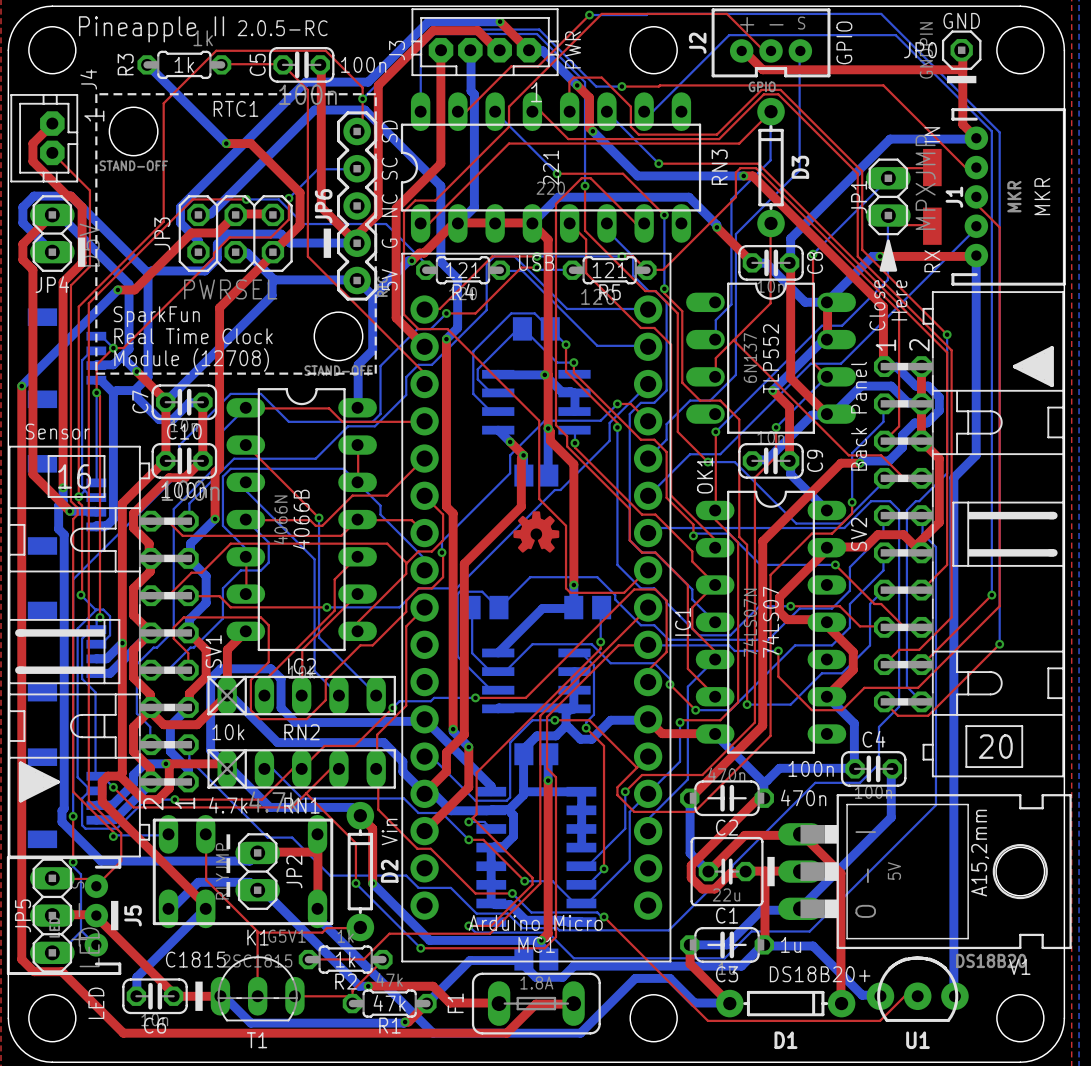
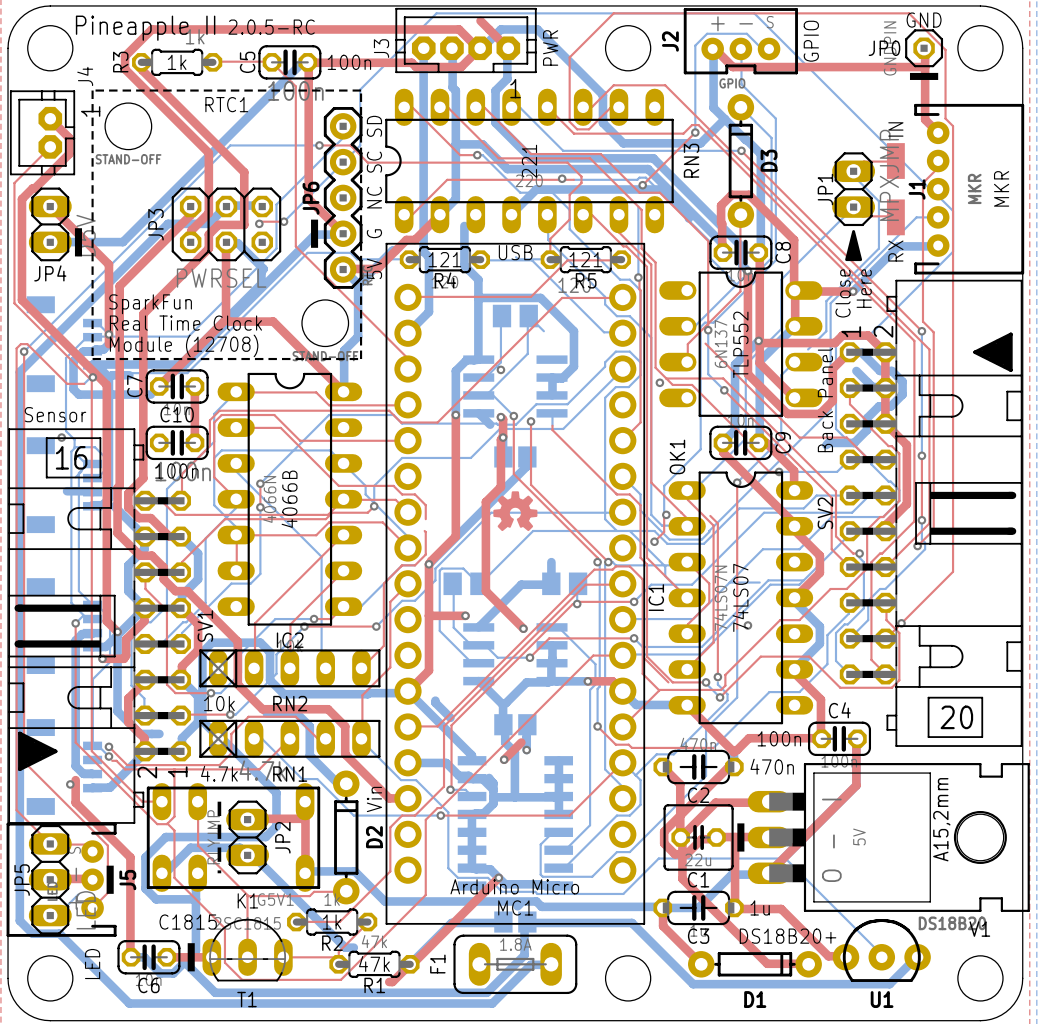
top track: (638, 13) (601, 13) (509, 106) (509, 126) (435, 200) (415, 200) (403, 211) (403, 314) (418, 329) (447, 329) (539, 420) (539, 498) (566, 525) (566, 588) (570, 592) (618, 592) -> (613, 13) (569, 57) (569, 121) (577, 129) (589, 129) (610, 107) (618, 107)
bottom track: (647, 13) (589, 15) -> (622, 13) (436, 13) (417, 32)
top track: (726, 13) (763, 50) (771, 50) -> (698, 13) (909, 13) (945, 49) (945, 118) (953, 126) (953, 571)
bottom track: (785, 13) (881, 13) (999, 132) (999, 644) -> none
top track: (589, 15) (538, 66) (511, 66) (466, 111) (457, 111) -> none
via: (589, 15) -> none
bottom track: (500, 21) (428, 21) (368, 82) (305, 82) (180, 207) (180, 222) (198, 240) (198, 251) -> none
via: (500, 21) -> none
top track: (433, 30) (378, 85) (378, 213) (355, 236) (357, 243) -> (416, 29) (151, 29) (125, 56) (125, 69) (208, 152) (208, 213) (191, 230) (190, 242)
bottom track: (434, 34) (536, 34) (585, 82) (585, 186) -> none
bottom track: (735, 35) (729, 35) (653, 111) (644, 111) -> (707, 33) (695, 45) (695, 132)
bottom track: (777, 35) (895, 35) (991, 131) (991, 219) -> (754, 13) (929, 188) (938, 188) (939, 197) (953, 210)
bottom track: (420, 47) (420, 111) -> (404, 45) (360, 89) (360, 145) (343, 162)
top track: (441, 50) (440, 163) (396, 208) (396, 317) (424, 346) -> none
top track: none -> (480, 48) (461, 67) (416, 67) (411, 62) (308, 62)
bottom track: none -> (480, 48) (500, 29) (537, 29) (602, 94) (602, 122) (623, 143) (700, 143) (724, 119)
bottom track: (529, 50) (542, 50) (577, 85) -> (508, 48) (507, 78) (495, 90) (495, 122) (531, 158) (653, 158) (742, 247) (742, 265) (747, 271)
bottom track: none -> (740, 48) (741, 84) (775, 118) (775, 260) (713, 322) (704, 322) (700, 326) (700, 449) (664, 485) (664, 517)
bottom track: (800, 50) (799, 170) (735, 234) (735, 374) (710, 400) (690, 400) (666, 424) (666, 439) (648, 458) -> (769, 48) (761, 48) (746, 33)
bottom track: (147, 64) (226, 143) -> none
top track: (577, 85) (589, 97) (589, 127) (592, 131) -> none
via: (577, 85) -> none
top track: (621, 86) (883, 85) (965, 167) (976, 167) -> (917, 546) (933, 529) (933, 332) (922, 321) (922, 183) (938, 168) (938, 161)
bottom track: (621, 86) (596, 86) (539, 29) (431, 29) (362, 98) -> none
via: (621, 86) -> none
via: (362, 98) -> none
top track: none -> (404, 107) (412, 107) (460, 155) (477, 155)
top track: none -> (475, 107) (484, 107) (531, 154) (600, 154) (639, 192) (659, 192) (708, 241) (708, 330)
bottom track: (495, 111) (557, 173) -> none
top track: (532, 111) (541, 112) (568, 139) (597, 139) -> (547, 107) (573, 133)
bottom track: none -> (511, 107) (520, 107) (563, 150) (741, 150)
top track: (569, 111) (569, 82) (573, 77) (601, 77) (630, 106) (630, 126) (638, 134) (716, 134) (761, 89) (780, 89) (862, 171) (862, 249) (947, 334) -> none
bottom track: (606, 111) (658, 163) -> none
top track: (771, 111) (739, 143) (509, 143) (465, 187) -> (573, 179) (447, 179)
bottom track: (771, 111) (770, 160) (731, 199) (731, 304) (715, 320) (715, 339) -> (740, 107) (771, 137) (771, 258) (751, 278) (742, 278) (695, 325) (687, 325)
top track: (52, 123) (32, 143) (32, 161) (67, 196) (70, 196) (82, 207) (82, 263) (63, 282) (63, 487) -> none
top track: (357, 131) (362, 126) (362, 87) (325, 50) (216, 50) (163, 103) (163, 221) (78, 306) (78, 502) (82, 505) (80, 595) -> none
bottom track: none -> (343, 126) (343, 137) (276, 204) (276, 248) (188, 336) (92, 337)
bottom track: (592, 131) (637, 175) -> (455, 144) (482, 144) (507, 169) (612, 169)
via: (592, 131) -> none
top track: none -> (695, 132) (642, 185)
via: none -> (695, 132)
bottom track: (976, 138) (890, 139) (790, 238) (790, 262) -> (712, 48) (713, 107) (760, 154) (759, 251)
top track: (711, 139) (719, 139) (763, 94) (778, 94) (857, 173) (857, 256) (951, 350) (951, 354) -> (683, 133) (692, 125) (698, 125) (914, 340)
top track: (226, 143) (250, 143) (300, 192) (300, 225) (219, 307) (219, 467) (215, 472) (215, 519) -> none
via: (226, 143) -> none
top track: none -> (319, 145) (350, 145) (367, 162) (567, 162) (581, 176) (581, 183) (569, 194) (569, 219) (550, 238) (550, 259)
bottom track: none -> (319, 145) (230, 145) (24, 351)
via: none -> (319, 145)
top track: (52, 152) (89, 190) (89, 266) (70, 285) (70, 501) (77, 507) (77, 514) (73, 519) (73, 791) (113, 832) (113, 836) -> (50, 146) (14, 183) (14, 303) (91, 380) (91, 751) (142, 801) (161, 801)
top track: none -> (741, 150) (921, 331)
via: none -> (741, 150)
via: none -> (477, 155)
top track: (658, 163) (758, 163) (947, 352) (947, 564) -> (583, 107) (592, 106) (613, 85) (665, 85) (929, 349) (929, 523) (910, 542)
via: (658, 163) -> none
bottom track: (357, 169) (317, 169) (288, 198) -> (343, 162) (284, 221)
top track: (557, 173) (623, 173) -> (439, 107) (448, 107) (498, 158) (590, 158) (598, 166)
via: (557, 173) -> none
bottom track: (674, 175) (743, 175) -> (648, 169) (722, 243) (722, 252)
top track: (743, 175) (752, 175) (779, 202) -> none
via: (743, 175) -> none
bottom track: (888, 178) (813, 254) -> none
bottom track: (440, 186) (364, 110) (314, 110) (210, 213) (198, 214) -> (423, 178) (423, 48)
top track: (585, 186) (585, 230) (645, 291) (655, 291) (665, 301) -> (639, 278) (639, 289)
bottom track: none -> (573, 179) (637, 179) (639, 177) (645, 177) (710, 242) (710, 258) (736, 284)
via: none -> (642, 185)
top track: (976, 196) (977, 205) (999, 227) (999, 606) (918, 687) (864, 687) (842, 710) (811, 710) (778, 676) (778, 650) -> none
top track: (288, 198) (288, 219) (270, 237) (229, 237) (213, 253) (213, 257) (123, 348) (113, 348) (96, 364) (96, 392) (99, 396) (99, 617) -> none
via: (288, 198) -> none
top track: (246, 199) (192, 199) (88, 303) (88, 800) (121, 833) (121, 861) (96, 886) -> none
bottom track: (246, 199) (278, 199) (303, 224) (386, 224) (425, 263) (425, 269) -> (84, 383) (95, 373) (187, 373) (307, 252) (350, 252) (357, 259) (408, 259)
via: (246, 199) -> none
top track: (52, 214) (22, 244) -> (50, 118) (69, 137) (69, 154) (21, 199) (21, 234)
top track: none -> (50, 206) (108, 264) (108, 344)
bottom track: (52, 214) (59, 215) (129, 284) (129, 349) (113, 364) (96, 365) -> none
top track: (272, 214) (239, 213) (235, 215) (217, 232) (191, 232) (134, 289) (117, 289) -> none
bottom track: none -> (262, 206) (226, 206) (208, 223) (168, 223) (113, 278)
via: (664, 215) -> none
bottom track: (887, 216) (887, 279) (842, 325) (821, 325) (715, 431) -> (853, 207) (781, 279) (781, 329) (745, 364) (745, 438) (694, 490) (687, 490)
top track: (569, 223) (586, 239) (586, 273) (640, 327) (654, 327) (671, 344) (671, 495) (677, 502) -> none
bottom track: none -> (547, 214) (548, 239) (605, 296) (605, 304) (616, 316) (629, 316) (651, 337) (651, 514) (662, 525) (687, 526)
top track: none -> (583, 214) (592, 215) (646, 266) (646, 557) (687, 597)
bottom track: (606, 223) (607, 230) (633, 256) (633, 275) (648, 291) -> (477, 155) (482, 155) (520, 192) (552, 192) (569, 209) (569, 229) (620, 279) (623, 279)
top track: (644, 223) (635, 222) (590, 178) (581, 178) (555, 203) (555, 425) (567, 436) (567, 446) (629, 509) (629, 540) (642, 552) (655, 552) (687, 585) (687, 668) (715, 696) -> (709, 521) (713, 525) (713, 642) (687, 669)
bottom track: (976, 226) (976, 228) (859, 344) -> (853, 171) (854, 176) (878, 201) (878, 248) (826, 301) (826, 331)
top track: (716, 227) (751, 262) -> (749, 194) (731, 194) (721, 205) (722, 251)
via: (716, 227) -> none
top track: none -> (284, 221) (261, 221) (259, 223)
via: none -> (284, 221)
via: none -> (259, 223)
bottom track: none -> (464, 226) (464, 265) (478, 279) (478, 359) (466, 360) (455, 370) (455, 415)
bottom track: (357, 243) (289, 243) (281, 234) (227, 234) (217, 244) (217, 258) (205, 270) (151, 270) (148, 273) -> (343, 233) (315, 234) (185, 364) (92, 365)
top track: (826, 249) (883, 306) (884, 366) -> (747, 271) (747, 374) (787, 413) (819, 413) (832, 401) (832, 368) (849, 352)
top track: none -> (794, 239) (794, 290) (853, 291)
bottom track: (52, 252) (22, 222) (22, 207) (34, 196) (70, 196) (148, 273) -> (50, 242) (122, 242) (302, 62) (307, 62)
top track: none -> (226, 242) (226, 319)
top track: (419, 253) (424, 253) (453, 224) (458, 222) (532, 223) (548, 239) (548, 428) (550, 431) (550, 440) (573, 464) (573, 585) -> (403, 243) (406, 239) (415, 239) (439, 214)
top track: (813, 254) (813, 362) (826, 376) -> none
via: (813, 254) -> none
top track: (976, 255) (880, 256) -> none
top track: (536, 256) (492, 256) (439, 308) -> (621, 259) (567, 260) (531, 296) (422, 296)
bottom track: (536, 256) (621, 256) -> none
via: (536, 256) -> none
top track: (621, 256) (633, 256) (646, 270) (663, 269) (735, 197) (735, 172) (740, 168) (756, 168) (899, 311) (899, 426) (884, 441) -> none
via: (621, 256) -> none
bottom track: (880, 256) (872, 256) (826, 302) (805, 302) (766, 263) (752, 262) -> none
via: (880, 256) -> none
bottom track: (976, 256) (976, 455) (953, 477) (954, 996) -> (938, 246) (898, 246) (853, 291)
top track: (22, 259) (32, 269) (32, 474) (69, 511) -> (21, 249) (21, 300) (106, 384) (106, 621) (117, 631)
top track: none -> (395, 250) (377, 268) (343, 269)
via: (411, 260) -> none
bottom track: (991, 262) (991, 595) -> (953, 251) (866, 338) (843, 338) (835, 346) (835, 428) (899, 490) (899, 500) (883, 517) (831, 517) (799, 549) (762, 549) (729, 582)
bottom track: (446, 267) (457, 278) (457, 327) (446, 339) -> (428, 257) (428, 311) (407, 333)
top track: (536, 267) (521, 267) (475, 313) (446, 313) -> none
via: (536, 267) -> none
bottom track: (522, 270) (597, 345) (628, 345) -> (502, 260) (532, 260) (604, 332)
bottom track: (148, 273) (148, 377) (134, 390) (136, 397) (159, 419) (172, 419) (189, 402) (202, 402) -> none
bottom track: (274, 279) (357, 280) -> none
via: none -> (747, 271)
top track: (664, 288) (664, 293) (682, 311) -> (638, 206) (641, 209) (641, 248) (655, 262) (655, 299)
via: (117, 289) -> none
top track: (666, 302) (677, 313) -> (618, 214) (619, 232) (651, 264) (651, 301)
top track: none -> (640, 290) (640, 422) (622, 440)
via: none -> (853, 291)
top track: none -> (622, 297) (562, 297) (437, 422) (401, 422) (389, 410) (219, 410) (209, 420) (209, 446) (181, 474) (180, 500)
bottom track: (648, 309) (567, 308) (514, 256) (494, 256) (486, 264) (486, 310) (431, 364) (418, 364) (406, 377) (406, 395) (374, 426) (348, 426) (342, 431) -> (536, 404) (515, 424) (402, 423) (393, 415) (329, 415)
bottom track: (446, 313) (430, 329) (417, 329) (380, 365) (380, 414) (372, 421) (288, 421) (260, 393) (230, 393) (179, 445) (179, 473) (73, 579) (73, 816) -> none
via: (446, 313) -> none
bottom track: (522, 328) (557, 362) (573, 362) -> none
bottom track: (550, 328) (534, 313) (511, 313) (473, 351) (473, 393) (490, 410) (498, 411) -> (528, 316) (527, 353) (486, 394) (478, 395) (490, 392) (513, 416)
bottom track: (521, 329) (517, 329) (477, 369) (477, 379) (491, 392) (498, 392) -> (500, 316) (500, 362) (485, 377) (478, 377)
top track: none -> (226, 319) (159, 386)
top track: none -> (226, 319) (229, 321) (273, 321) (343, 391)
bottom track: (947, 334) (947, 473) (919, 501) (915, 501) (906, 510) (906, 686) (921, 701) -> none
via position: (947, 334) -> (921, 331)
top track: (446, 339) (446, 506) (453, 513) (453, 729) -> none
via: (446, 339) -> none
top track: (733, 340) (848, 455) -> (705, 343) (799, 437) (815, 437)
bottom track: (826, 340) (823, 340) (772, 390) -> (794, 326) (759, 361) (758, 442)
bottom track: none -> (708, 330) (708, 374) (724, 390)
via: none -> (708, 330)
top track: (566, 344) (566, 371) (617, 422) (617, 427) -> none
via: (566, 344) -> none
bottom track: none -> (921, 331) (921, 455)
bottom track: (91, 351) (82, 360) (82, 473) -> (87, 337) (66, 358) (66, 431) (74, 439) (75, 447)
via: none -> (758, 340)
bottom track: (121, 356) (136, 371) -> none
top track: none -> (759, 343) (834, 343) (842, 335) (868, 335) (885, 352)
bottom track: none -> (108, 344) (103, 349) (83, 351) (73, 361) (73, 389) (78, 394) (150, 394)
top track: (573, 362) (573, 372) (640, 439) (654, 439) (666, 452) (666, 497) (693, 524) (693, 535) -> none
via: (573, 362) -> none
bottom track: (840, 363) (810, 363) (720, 454) (690, 454) (648, 495) -> (938, 217) (916, 217) (830, 303) (830, 409) (701, 539) (669, 539) (640, 510) (640, 494) (622, 476)
top track: none -> (24, 351) (24, 761) (107, 845) (107, 892) (92, 907)
top track: (136, 371) (165, 402) (165, 460) (122, 503) (122, 507) -> (190, 206) (190, 215) (119, 286) (119, 485) (117, 488)
via: (136, 371) -> none
bottom track: (498, 374) (544, 374) (561, 391) (574, 392) -> (478, 297) (540, 297) (573, 331) (573, 366) (562, 378) (552, 377)
via: (544, 374) -> none
via: none -> (500, 369)
top track: (21, 386) (21, 959) (34, 971) (61, 971) (123, 1033) (506, 1033) (535, 1004) (573, 1003) -> none
bottom track: none -> (20, 370) (19, 920) (32, 933) (59, 933) (129, 1003) (492, 1003) (531, 964) (551, 964)
via position: (21, 386) -> (24, 351)
bottom track: (891, 386) (861, 386) (834, 412) (811, 415) (767, 459) (752, 459) -> (758, 340) (735, 364) (735, 430) (723, 441)
top track: (772, 390) (789, 407) (789, 460) -> (794, 490) (794, 470) (766, 442) (758, 442)
via: (772, 390) -> none
bottom track: (813, 390) (776, 427) -> (781, 375) (781, 438) (737, 482)
bottom track: (96, 392) (96, 482) -> none
top track: none -> (666, 378) (723, 378) (835, 491) (835, 536) (853, 553) (859, 553)
via: none -> (659, 382)
top track: none -> (84, 383) (67, 383) (27, 344) (20, 344) (16, 348) (16, 810) (50, 843)
top track: (617, 403) (630, 403) (648, 421) -> none
bottom track: (617, 403) (600, 420) (590, 420) -> (640, 362) (629, 351) (615, 351) (605, 362) (605, 366) (567, 404)
via: (617, 403) -> none
bottom track: (884, 403) (883, 421) (852, 453) (852, 502) -> none
top track: none -> (724, 390) (831, 497) (831, 549) (849, 567)
via: none -> (724, 390)
top track: (739, 419) (739, 536) -> (710, 403) (745, 438) (745, 448) (769, 471) (779, 471)
bottom track: (558, 420) (544, 420) (510, 455) (510, 473) (441, 541) (441, 552) -> none
bottom track: (609, 422) (609, 440) (560, 490) (554, 490) (511, 533) -> (622, 512) (491, 512)
bottom track: none -> (585, 406) (563, 428) (499, 428) (470, 457) (402, 457) (374, 485) (374, 506)
bottom track: (617, 427) (617, 564) (637, 585) -> none
via: (617, 427) -> none
top track: (776, 427) (776, 456) (754, 477) (754, 702) -> (849, 388) (849, 404) (871, 425) (871, 428) (899, 453) (899, 500) (867, 529) (867, 568) (846, 588) (830, 588) (799, 620) (780, 620) (725, 674)
via: (776, 427) -> none
bottom track: (548, 428) (548, 475) -> (428, 564) (526, 466) (527, 456)
via: (548, 428) -> none
top track: none -> (455, 415) (455, 536) (428, 564) (428, 670) (407, 691)
via: none -> (455, 415)
top track: (677, 431) (707, 462) -> (651, 415) (651, 482)
top track: (715, 431) (715, 510) -> none
via: (715, 431) -> none
top track: none -> (513, 416) (513, 474) (597, 557) (597, 562)
via: none -> (513, 416)
via: none -> (500, 417)
top track: none -> (531, 421) (531, 484) (608, 562)
via: none -> (531, 421)
top track: (510, 441) (523, 455) (521, 458) -> (500, 417) (503, 419) (503, 436) (500, 440)
via: (510, 441) -> none
via: (574, 443) -> none
top track: (246, 445) (319, 517) -> (236, 427) (280, 427) (338, 485) (393, 485) (402, 494) (415, 494) (425, 505)
top track: (357, 445) (357, 482) -> none
via: none -> (61, 437)
bottom track: (315, 458) (234, 458) (189, 503) (188, 521) -> (303, 440) (260, 483)
top track: (424, 458) (387, 495) (352, 495) (322, 525) (315, 525) (310, 520) (245, 519) -> (407, 440) (300, 440) (274, 415) (221, 415) (214, 422) (214, 477) (236, 499)
top track: (939, 458) (939, 522) (918, 543) (921, 552) (903, 534) (877, 534) (865, 547) (827, 547) (779, 597) (779, 611) (787, 619) (823, 619) (853, 652) (853, 669) (826, 696) -> (902, 440) (906, 445) (906, 504) (886, 524) (885, 531)
top track: (202, 460) (184, 477) (169, 477) (149, 497) -> (141, 62) (142, 70) (244, 172) (244, 224) (218, 224) (208, 234) (208, 248) (143, 314) (143, 478)
top track: none -> (723, 442) (723, 452) (793, 522) (795, 530) (819, 555) (819, 572) (794, 597)
bottom track: (789, 460) (790, 474) (826, 510) -> none
bottom track: (707, 462) (734, 462) (796, 523) (842, 523) -> (629, 530) (654, 530) (667, 543) (703, 543) (739, 508) (803, 508) (809, 503)
via: (707, 462) -> none
top track: (859, 463) (840, 463) (762, 541) (762, 725) (690, 798) -> none
via: (859, 463) -> none
top track: none -> (921, 455) (921, 520)
via: none -> (921, 455)
bottom track: (82, 475) (82, 487) (91, 496) (96, 497) -> (75, 623) (83, 615) (92, 619) (86, 617) (71, 602) (71, 451) (75, 447) (95, 447) (105, 457) (105, 469) (98, 477) (92, 478)
bottom track: (883, 478) (883, 482) (849, 515) -> (848, 495) (816, 495)
bottom track: none -> (848, 460) (837, 471) (779, 471)
bottom track: (63, 487) (63, 501) (58, 505) (58, 529) (64, 534) (64, 808) (61, 810) (61, 821) (101, 861) (249, 861) (257, 852) -> none
via: (63, 487) -> none
via: none -> (779, 471)
top track: (424, 495) (443, 514) (443, 525) -> none
via: (78, 496) -> none
top track: none -> (737, 482) (737, 628)
via: none -> (737, 482)
top track: (852, 502) (852, 513) (832, 533) (811, 533) (770, 574) (770, 735) (694, 811) (634, 811) (617, 795) (617, 787) (648, 756) -> none
via: (852, 502) -> none
top track: none -> (260, 483) (260, 507)
via: none -> (260, 483)
via: (69, 511) -> none
bottom track: (883, 515) (883, 533) (849, 567) (849, 590) -> (848, 535) (816, 567)
bottom track: (921, 515) (922, 533) (935, 547) (935, 805) (809, 931) (751, 931) (724, 958) (573, 958) (548, 932) (475, 932) (468, 925) -> (885, 495) (869, 495) (852, 512) (764, 512) (692, 584) (651, 584) (634, 601)
bottom track: (319, 517) (319, 637) (376, 695) -> none
via: (319, 517) -> none
bottom track: (215, 519) (190, 543) (190, 554) (188, 558) -> none
via: (215, 519) -> none
bottom track: (245, 519) (268, 542) (268, 562) (260, 570) (240, 570) (222, 588) (222, 618) (213, 627) -> (236, 499) (235, 508) (205, 538) (205, 602)
top track: (505, 522) (464, 563) (464, 734) (446, 752) (446, 771) (424, 793) -> (485, 501) (485, 591) (523, 628)
top track: (666, 525) (692, 551) (692, 561) (715, 584) (692, 607) (692, 628) (714, 650) (715, 659) -> (640, 505) (640, 557) (646, 564) (646, 656) (672, 682) (706, 682)
bottom track: none -> (114, 506) (145, 536) (144, 549) (128, 565) (128, 591) (145, 608)
top track: none -> (374, 506) (367, 512) (332, 512) (325, 519) (224, 519) (221, 522)
via: none -> (374, 506)
bottom track: none -> (260, 507) (260, 573) (250, 583) (231, 583) (181, 633) (180, 643)
via: none -> (260, 507)
bottom track: (648, 533) (653, 528) (844, 528) (871, 501) (890, 501) (899, 510) (899, 585) -> (859, 553) (859, 557) (863, 562)
bottom track: (693, 535) (695, 533) (729, 533) (760, 564) (835, 564) -> none
top track: none -> (664, 517) (664, 532) (654, 541)
top track: (144, 539) (149, 543) (150, 571) (133, 588) (133, 615) (151, 632) -> (139, 518) (150, 518) (169, 536) (180, 536)
top track: (443, 540) (431, 551) (418, 551) (406, 563) (406, 573) (358, 621) (357, 631) -> (314, 619) (331, 619) (343, 606)
bottom track: none -> (921, 520) (921, 539) (925, 542) (925, 549) (885, 588) (880, 588) (868, 600) (868, 620) (849, 638)
via: none -> (921, 520)
top track: (738, 542) (738, 607) -> (687, 562) (709, 583)
top track: (951, 542) (951, 617) (919, 649) (899, 649) (884, 664) -> (914, 521) (871, 562) (871, 659) (885, 674)
top track: (230, 543) (342, 543) -> (236, 535) (316, 535) (329, 522)
top track: (387, 543) (406, 563) -> (372, 522) (382, 522) (407, 548)
via: (441, 552) -> none
bottom track: none -> (616, 530) (533, 530) (509, 554)
top track: (122, 554) (122, 772) (120, 776) -> (117, 533) (140, 555) (151, 555) (163, 567) (163, 579) (175, 591) (187, 591) (237, 641) (237, 684) (262, 709) (328, 709) (345, 726) (345, 754) (389, 798) (407, 798)
bottom track: (883, 557) (883, 570) (849, 604) (849, 627) (832, 645) (795, 645) (730, 710) (695, 710) -> none
bottom track: (314, 559) (314, 671) (334, 691) -> (302, 537) (321, 556) (321, 664)
via: none -> (654, 541)
top track: (835, 564) (874, 604) (881, 604) (903, 626) (921, 627) -> none
via: (835, 564) -> none
via: none -> (917, 546)
top track: (648, 570) (624, 592) -> (615, 566) (612, 569) (599, 569)
top track: (201, 572) (191, 572) (169, 595) (151, 595) -> (193, 550) (181, 562) (180, 572)
via: none -> (859, 553)
bottom track: (530, 577) (597, 577) (615, 595) (615, 599) (640, 625) (654, 625) (668, 639) (768, 639) (799, 608) (801, 608) -> (622, 655) (700, 654) (770, 584)
top track: (334, 579) (334, 610) (265, 680) -> (321, 556) (255, 623) (255, 653)
via: (573, 585) -> none
bottom track: none -> (597, 562) (599, 564) (599, 686) (597, 688) (597, 726)
via: none -> (597, 562)
via: none -> (608, 562)
via: none -> (428, 564)
bottom track: (431, 588) (456, 588) -> (376, 626) (402, 600) (415, 600) (435, 580) (435, 568) (438, 565)
bottom track: (654, 588) (699, 635) (730, 635) -> (628, 565) (683, 565) (687, 562)
top track: (640, 589) (634, 589) (525, 697) (475, 697) -> none
bottom track: (884, 590) (870, 604) (870, 645) (842, 673) (821, 673) (790, 704) (747, 704) -> none
top track: none -> (594, 569) (437, 726) (407, 726)
bottom track: (80, 595) (96, 610) -> none
via: (80, 595) -> none
top track: none -> (145, 572) (145, 588) (166, 610)
top track: (188, 595) (219, 596) (230, 607) (326, 607) -> none
via: (991, 595) -> none
top track: (406, 600) (406, 611) (372, 645) (360, 645) (325, 680) (325, 700) (306, 719) (259, 719) (250, 710) (250, 680) (268, 662) (268, 625) (260, 617) (183, 617) (173, 627) (173, 635) -> (390, 577) (383, 583) (383, 645) (361, 668)
top track: (666, 600) (666, 652) (648, 669) (648, 682) -> (640, 577) (642, 579) (642, 673) (659, 690)
bottom track: none -> (803, 580) (768, 580) (701, 646) (642, 646) (634, 638)
top track: (790, 606) (839, 606) (859, 626) (884, 627) -> none
via: (790, 606) -> none
bottom track: (326, 607) (399, 607) -> (343, 606) (361, 606) (383, 583)
via: (326, 607) -> none
top track: (647, 608) (540, 715) (540, 883) (490, 933) (389, 933) (363, 959) (353, 959) -> (622, 584) (585, 584) (444, 726) (444, 786) (413, 815)
bottom track: (99, 617) (96, 620) (96, 629) (91, 629) (82, 638) (82, 678) (95, 692) (96, 776) -> (78, 456) (86, 464) (92, 464) (87, 464) (78, 473) (78, 591) (92, 604) (97, 605) (110, 617) (110, 662) (92, 679) (92, 745)
via: (99, 617) -> none
top track: none -> (634, 601) (579, 601) (572, 604) (451, 725) (451, 786)
via: none -> (634, 601)
top track: (738, 627) (738, 702) (720, 720) (682, 720) (680, 722) -> (709, 602) (687, 624) (687, 633)
bottom track: none -> (849, 602) (848, 613) (827, 635) (827, 664) (799, 692) (769, 692) (713, 747)
bottom track: (600, 628) (600, 642) -> none
top track: (245, 631) (227, 649) (227, 695) (197, 724) (163, 724) (152, 713) (151, 707) -> none
top track: (150, 633) (133, 649) (133, 677) (150, 694) (150, 706) -> (144, 608) (144, 621) (126, 639) (126, 655) (124, 658) (102, 658)
bottom track: (899, 633) (899, 706) (878, 726) (878, 763) (859, 782) (815, 782) (668, 930) (648, 930) -> (863, 608) (835, 633) (835, 660) (849, 674)
top track: (173, 638) (188, 653) (188, 669) -> (166, 613) (166, 684) (175, 693) (210, 693)
top track: none -> (428, 615) (465, 615)
via: none -> (465, 615)
top track: (600, 642) (600, 648) (476, 772) (476, 814) (468, 821) -> none
via position: (600, 642) -> (577, 604)
bottom track: (122, 643) (106, 658) (96, 658) -> none
via position: (122, 643) -> (117, 631)
bottom track: (96, 644) (102, 643) (110, 635) (110, 616) (103, 609) (96, 609) (77, 628) (77, 777) (91, 790) (96, 790) (89, 790) (82, 798) (82, 825) (85, 828) (116, 828) (145, 799) (174, 799) -> none
bottom track: none -> (314, 619) (275, 619) (241, 653) (241, 672) (220, 693) (210, 693)
via: none -> (314, 619)
top track: (648, 644) (618, 645) (547, 716) (547, 768) (555, 777) (555, 937) (544, 948) (420, 948) -> none
bottom track: (648, 644) (729, 645) (734, 650) (778, 650) -> (622, 619) (693, 619) (701, 610)
top track: (999, 644) (935, 707) -> (885, 602) (886, 620) (899, 633) (899, 680)
via: (999, 644) -> none
top track: none -> (75, 623) (75, 742) (157, 824) (166, 824) (174, 816) (174, 769)
via: none -> (75, 623)
via: none -> (901, 623)
top track: none -> (304, 626) (376, 626)
bottom track: none -> (304, 626) (276, 654) (276, 673) (235, 714) (230, 714)
via: none -> (304, 626)
via: none -> (376, 626)
via: none -> (523, 628)
bottom track: none -> (117, 631) (117, 711) (140, 733)
bottom track: (715, 659) (687, 686) (687, 779) (648, 818) (648, 831) -> (612, 562) (608, 562) (605, 565) (605, 769) (622, 786) (622, 798)
top track: none -> (634, 638) (549, 638) (529, 657)
bottom track: (593, 665) (593, 714) (586, 722) (586, 728) -> (570, 639) (595, 664) (595, 684) (590, 689) (590, 825) (580, 834)
bottom track: (498, 671) (505, 671) (532, 644) (591, 644) (610, 663) (654, 663) (669, 678) (669, 684) -> (478, 645) (485, 645) (497, 657) (529, 657)
top track: none -> (622, 655) (593, 655) (440, 808) (437, 808) (425, 819) (425, 895) (340, 979) (242, 979) (224, 962) (224, 928) (174, 877) (174, 830) (167, 823)
via: none -> (529, 657)
via position: (669, 684) -> (634, 638)
via: none -> (102, 658)
top track: (406, 694) (406, 705) (377, 734) -> (390, 667) (377, 680)
bottom track: (227, 695) (230, 695) (277, 742) -> none
top track: none -> (794, 669) (795, 673) (820, 699) (821, 738) (749, 738) (733, 752) (687, 705)
bottom track: (826, 696) (854, 723) (855, 768) (779, 768) (763, 782) (715, 733) -> (794, 669) (819, 643) (819, 626) (795, 601) (794, 597)
bottom track: (475, 697) (434, 697) (430, 701) (399, 701) (392, 707) -> none
via: (475, 697) -> none
top track: (884, 701) (897, 715) -> (720, 697) (760, 656) (809, 656) (840, 687) (862, 687)
bottom track: (188, 707) (170, 725) (170, 751) (188, 769) (188, 781) -> (180, 679) (198, 696) (198, 722) (181, 738) (180, 751)
via: (392, 707) -> none
bottom track: (498, 708) (573, 707) (566, 711) (566, 725) -> (478, 681) (503, 704)
bottom track: none -> (587, 681) (526, 682) (503, 704)
via: none -> (587, 681)
via: (695, 710) -> none
bottom track: none -> (706, 682) (720, 697)
via: none -> (706, 682)
bottom track: none -> (717, 682) (727, 694) (727, 700) (673, 754) (656, 754) (635, 775)
top track: (754, 713) (754, 722) (702, 775) (654, 775) -> (725, 685) (721, 689) (659, 689) (622, 726)
top track: (648, 719) (662, 733) (715, 733) -> (622, 691) (612, 681) (587, 681)
bottom track: (648, 719) (610, 720) (591, 739) (580, 739) (566, 725) -> (622, 691) (636, 704) (687, 705)
top track: (554, 720) (589, 720) (637, 767) -> none
bottom track: (554, 720) (532, 720) (510, 742) (510, 797) (506, 800) (475, 800) (431, 757) (424, 756) -> none
via: (554, 720) -> none
via: none -> (210, 693)
bottom track: (680, 722) (680, 761) (629, 811) (629, 861) -> (622, 762) (640, 780) (640, 804) (629, 815) (616, 815) (605, 827)
via: (680, 722) -> none
top track: (377, 723) (354, 745) (324, 745) (301, 768) -> (362, 695) (362, 706)
bottom track: (566, 725) (555, 735) (536, 735) (525, 747) (523, 754) (523, 795) (509, 809) (450, 810) (434, 794) -> (493, 789) (482, 779) (459, 775) (446, 762) (417, 762)
via: none -> (720, 697)
top track: (586, 728) (604, 745) (604, 868) -> none
via: (586, 728) -> none
via: (453, 729) -> none
bottom track: none -> (503, 704) (505, 742) (514, 752) (514, 797)
bottom track: (308, 742) (383, 742) (402, 761) (402, 771) (424, 793) -> (296, 713) (309, 726) (309, 755) (337, 783) (345, 783)
top track: none -> (230, 714) (180, 715)
via: none -> (230, 714)
bottom track: (188, 744) (189, 759) (267, 837) (292, 837) (330, 875) (406, 875) (418, 887) (450, 887) (466, 903) -> none
top track: (468, 747) (468, 787) (424, 831) -> none
via: (468, 747) -> none
via: none -> (597, 726)
bottom track: (145, 763) (133, 775) (133, 783) (112, 805) (96, 805) -> (92, 633) (82, 634) (75, 640) (75, 766) (83, 773) (92, 774)
top track: (165, 763) (221, 763) (227, 768) -> none
via: (165, 763) -> none
top track: (169, 763) (169, 788) (158, 799) (143, 799) (120, 776) -> none
top track: (338, 768) (330, 769) (292, 807) (133, 807) (113, 787) -> (325, 738) (317, 738) (295, 716) (248, 716) (231, 733) (231, 753) (219, 765) (127, 765) (108, 746)
top track: (376, 768) (378, 768) (378, 809) (418, 848) -> (339, 921) (390, 871) (390, 827) (402, 815)
bottom track: none -> (361, 738) (388, 767)
top track: none -> (857, 738) (856, 785) (769, 873)
top track: (301, 769) (292, 769) (262, 799) (174, 799) -> (289, 739) (259, 769) (125, 769) (116, 760) (112, 760)
top track: none -> (521, 742) (504, 759)
top track: (642, 775) (625, 791) -> (616, 744) (597, 726)
top track: none -> (628, 744) (631, 747) (713, 747)
top track: (120, 776) (107, 776) (102, 781) (102, 801) (205, 904) (205, 908) -> none
via: none -> (108, 746)
top track: (548, 780) (548, 933) (541, 940) -> none
via: none -> (504, 759)
bottom track: (581, 791) (523, 791) -> none
bottom track: (625, 791) (625, 828) (588, 865) (581, 866) -> none
via: (625, 791) -> none
top track: (306, 793) (355, 843) (355, 883) -> none
top track: none -> (622, 762) (569, 815) (440, 815)
bottom track: (302, 798) (403, 798) -> (290, 767) (302, 779) (317, 779) (353, 815) (440, 815)
bottom track: (689, 798) (690, 853) (708, 871) -> none
via: (174, 799) -> none
bottom track: (269, 807) (351, 807) (359, 815) -> (259, 775) (276, 793) (276, 826) (265, 837) (165, 837) (145, 857) (145, 888) (156, 899) (195, 899)
top track: none -> (75, 780) (75, 802) (130, 857) (131, 957)
bottom track: (417, 811) (441, 813) (468, 839) -> (401, 780) (416, 780) (448, 812) (448, 868)
top track: (360, 815) (372, 828) (372, 883) -> none
top track: (73, 816) (73, 862) -> none
top track: (472, 818) (532, 877) (532, 884) (491, 925) (468, 925) -> none
bottom track: none -> (558, 796) (493, 797)
bottom track: (168, 834) (113, 836) -> none
top track: (800, 834) (840, 873) (840, 1003) -> (663, 767) (680, 784) (682, 878) (767, 963) (808, 963)
via: (113, 836) -> none
top track: (468, 839) (483, 839) (524, 881) -> none
via position: (468, 839) -> (440, 815)
top track: (430, 848) (475, 893) (512, 893) -> none
bottom track: (73, 862) (73, 866) (80, 874) (80, 930) (96, 944) -> none
via: (73, 862) -> none
via: (604, 868) -> none
bottom track: (524, 881) (552, 881) (573, 902) (581, 903) -> none
via: (524, 881) -> none
bottom track: (355, 883) (420, 948) -> none
via: (355, 883) -> none
bottom track: (372, 883) (429, 940) (535, 940) (548, 952) (548, 959) -> none
via: (372, 883) -> none
bottom track: (512, 893) (531, 912) (564, 912) -> (558, 832) (552, 832) (540, 844) (540, 874) (542, 876)
via: (512, 893) -> none
bottom track: (317, 908) (317, 918) (433, 1033) -> (184, 962) (215, 992) (416, 992)
bottom track: none -> (305, 873) (306, 871) (354, 871) (384, 901) (536, 901) (541, 906) (662, 907)
bottom track: (203, 910) (136, 977) (136, 996) -> (195, 874) (195, 950) (173, 973) (160, 973) (144, 957) (131, 957)
bottom track: (597, 912) (604, 916) -> (573, 876) (592, 876) (616, 852) (629, 852) (706, 775) (706, 728) (737, 697) (737, 628)
top track: none -> (498, 877) (410, 964)
via: none -> (498, 877)
top track: (96, 915) (173, 996) -> none
top track: (604, 916) (707, 1020) (880, 1020) (904, 996) (917, 996) -> none
via: (604, 916) -> none
via: (468, 925) -> none
bottom track: none -> (623, 893) (658, 858) (785, 858) (881, 954) (881, 957)
via: (541, 940) -> none
top track: none -> (734, 907) (781, 909) (828, 956) (846, 957)
via: (420, 948) -> none
bottom track: (523, 959) (523, 965) (535, 977) (562, 977) (573, 966) (741, 966) (764, 944) (813, 946) (862, 995) (880, 996) -> none
top track: (368, 986) (433, 986) (449, 1003) (499, 1003) -> none
via: (368, 986) -> none
bottom track: (220, 996) (224, 996) (250, 1023) (405, 1022) -> none
bottom track: (729, 1003) (694, 1003) (669, 978) (635, 978) (580, 1033) (506, 1033) -> (917, 957) (889, 984) (693, 984) (631, 922) (527, 922) (524, 926) (524, 955) (486, 992)
via: (405, 1022) -> none

